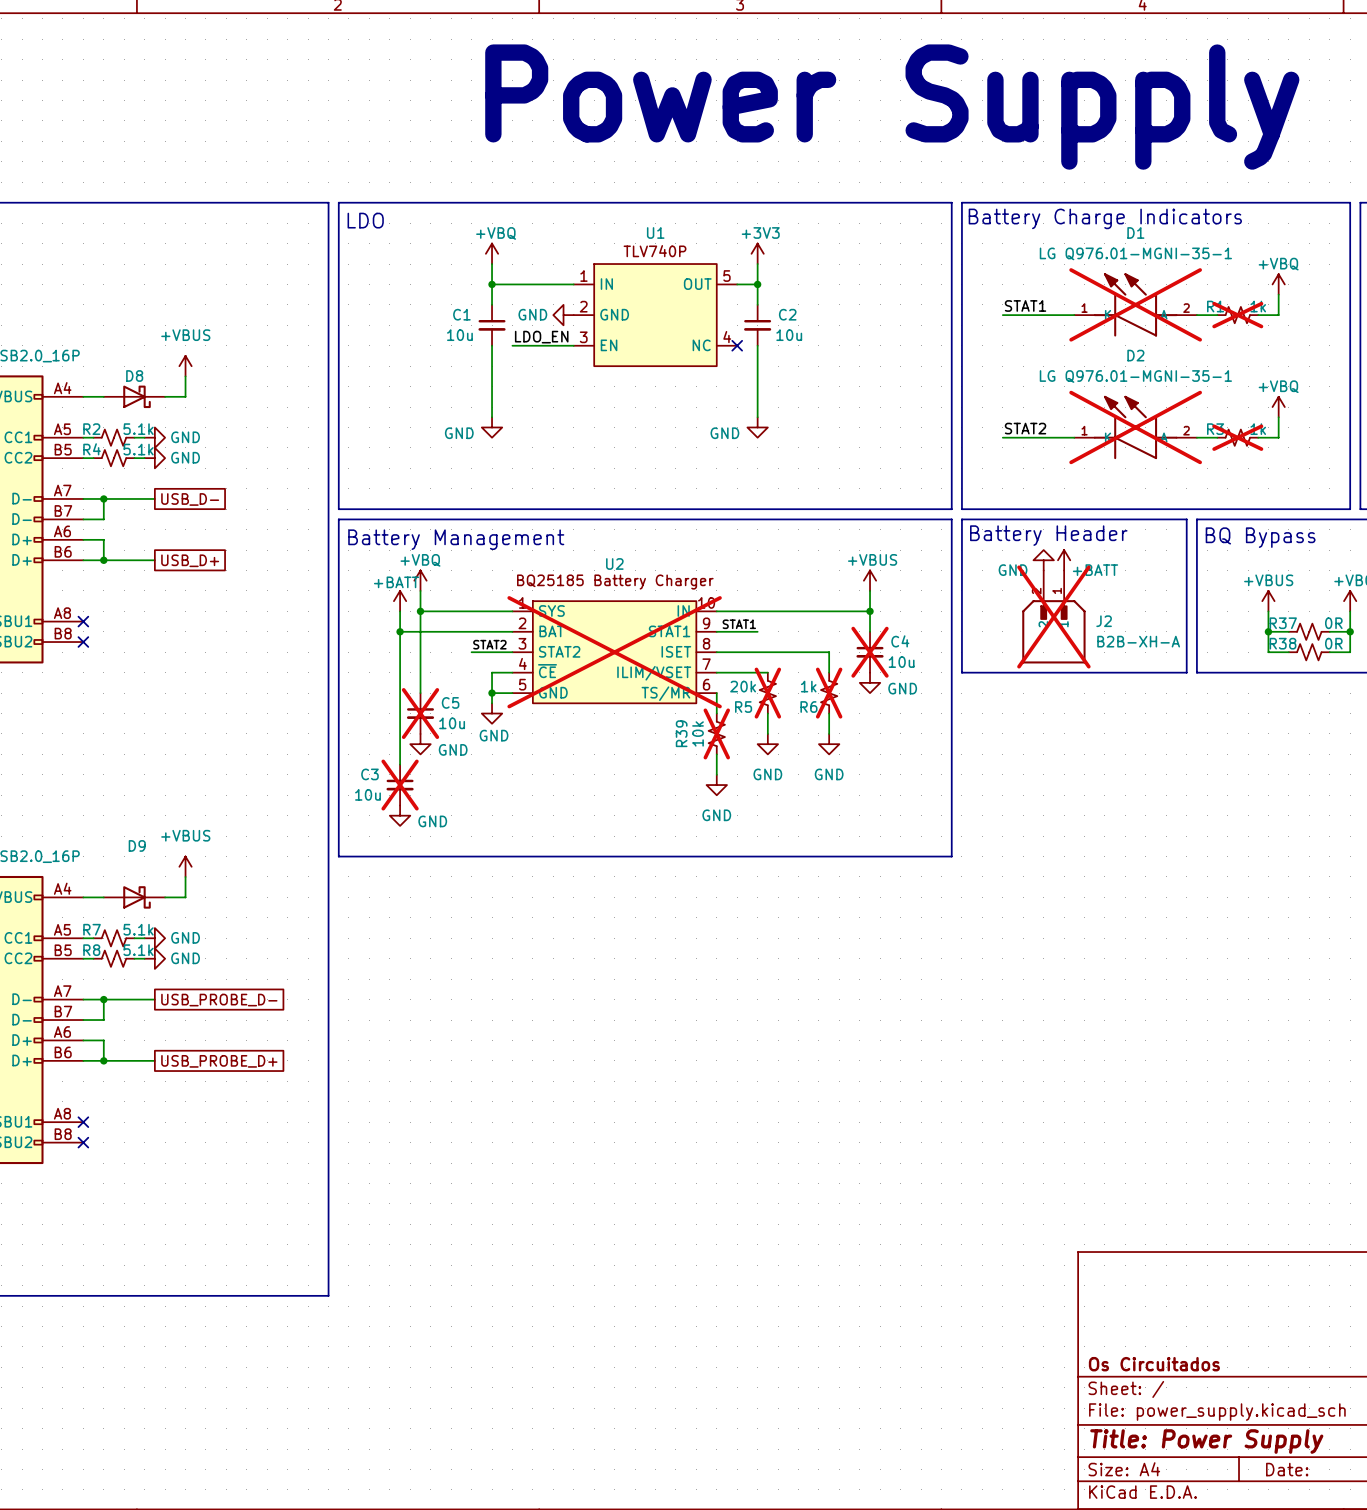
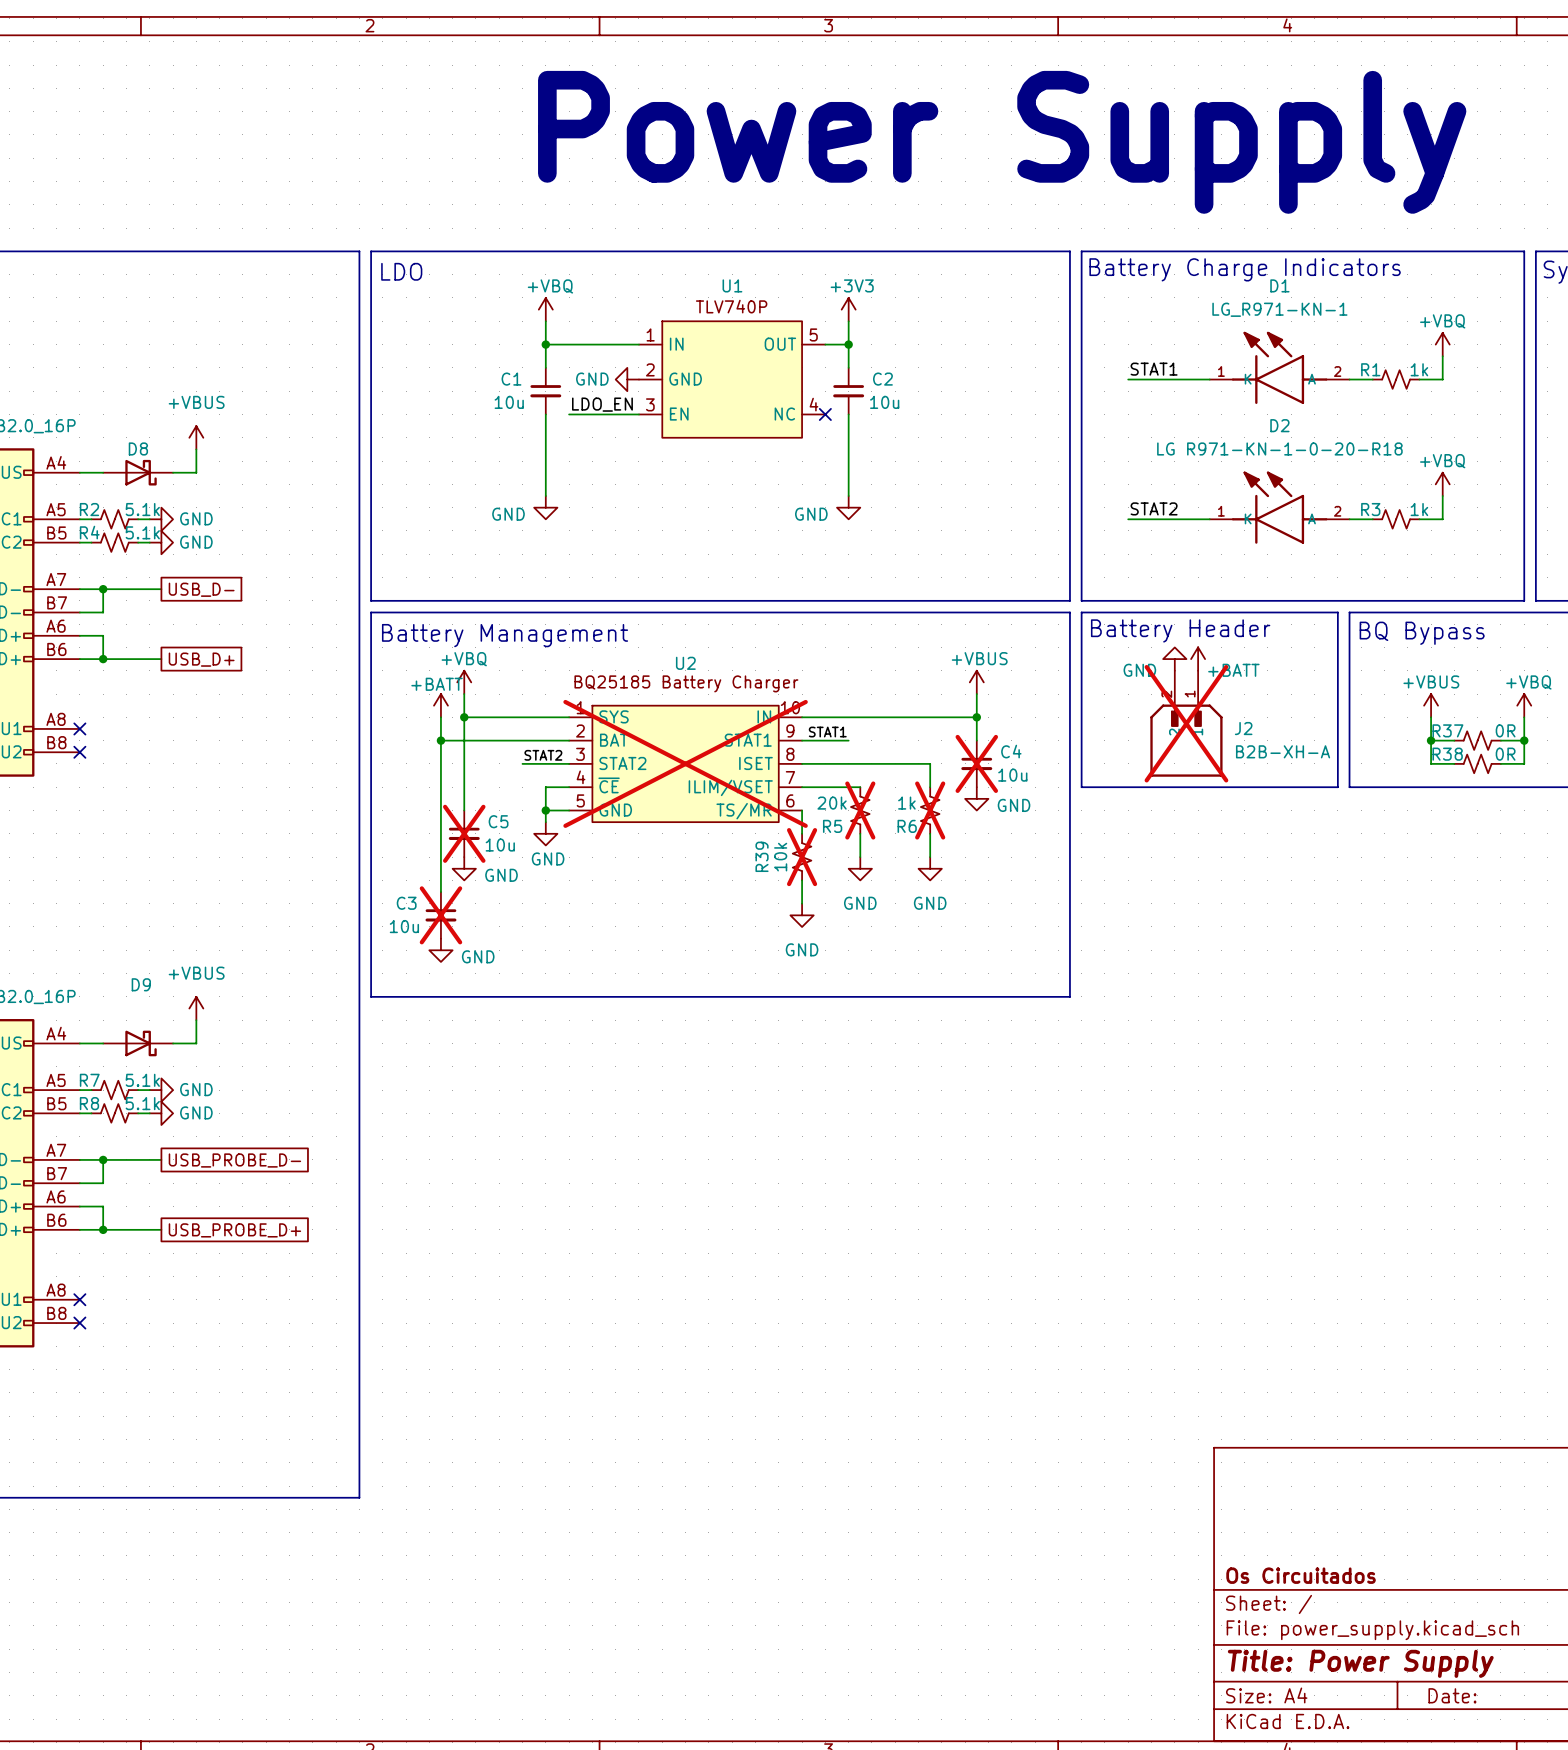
D1 value: LG Q976.01-MGNI-35-1 (1135, 253) -> LG_R971-KN-1 (1279, 309)
D1 do-not-place cross: (1135, 304) -> none
R1 do-not-place cross: (1237, 315) -> none
D2 value: LG Q976.01-MGNI-35-1 (1135, 376) -> LG R971-KN-1-0-20-R18 (1279, 448)
D2 do-not-place cross: (1135, 427) -> none
R3 do-not-place cross: (1237, 437) -> none

